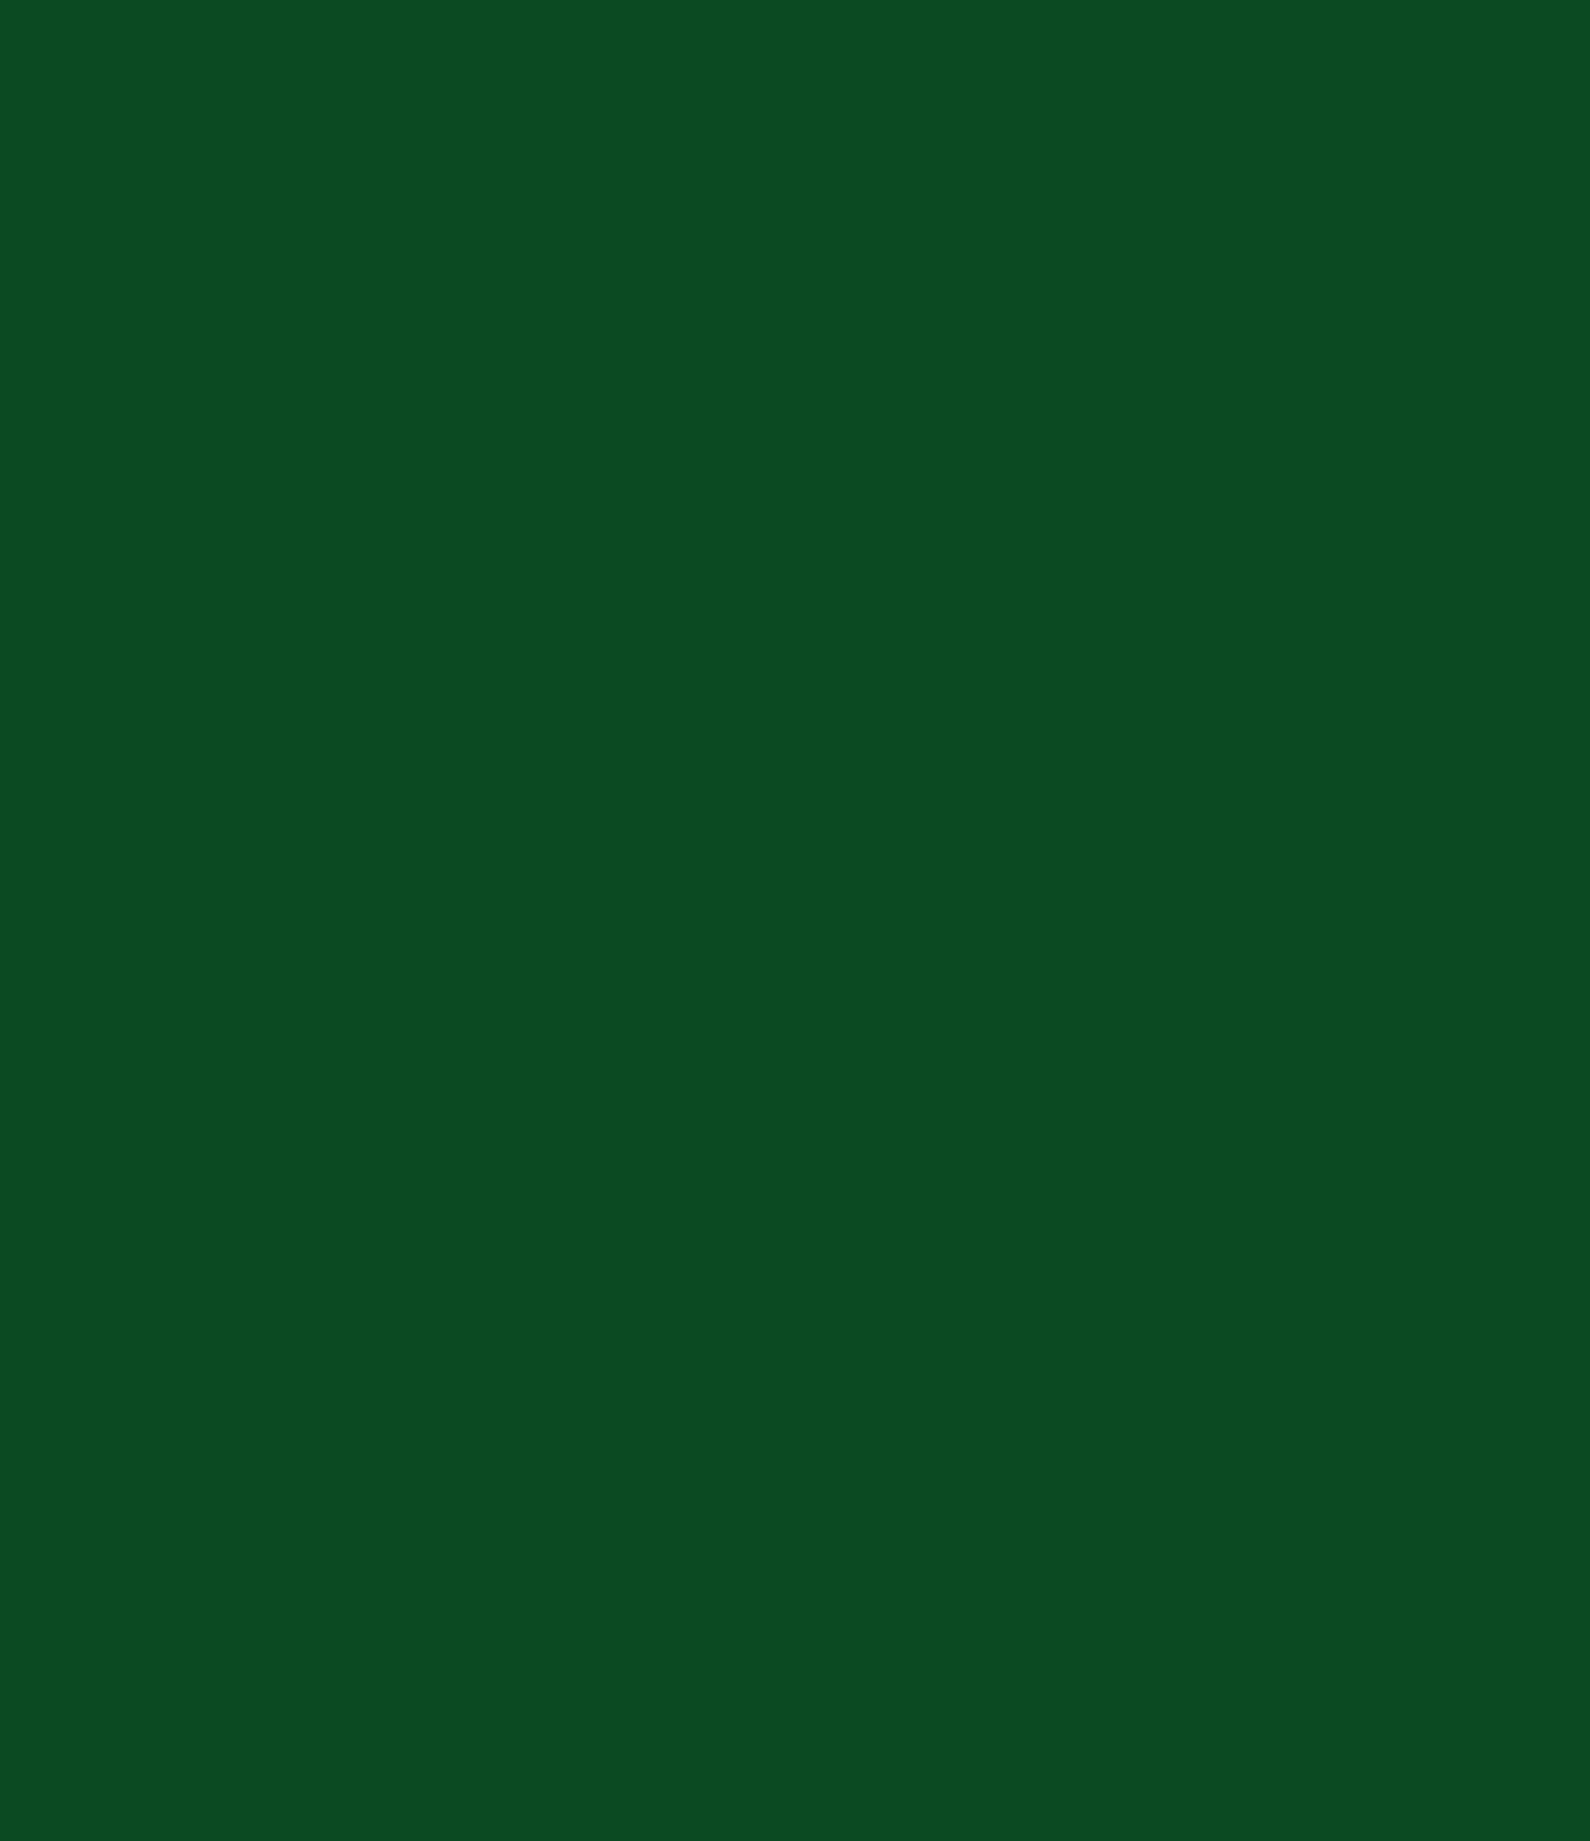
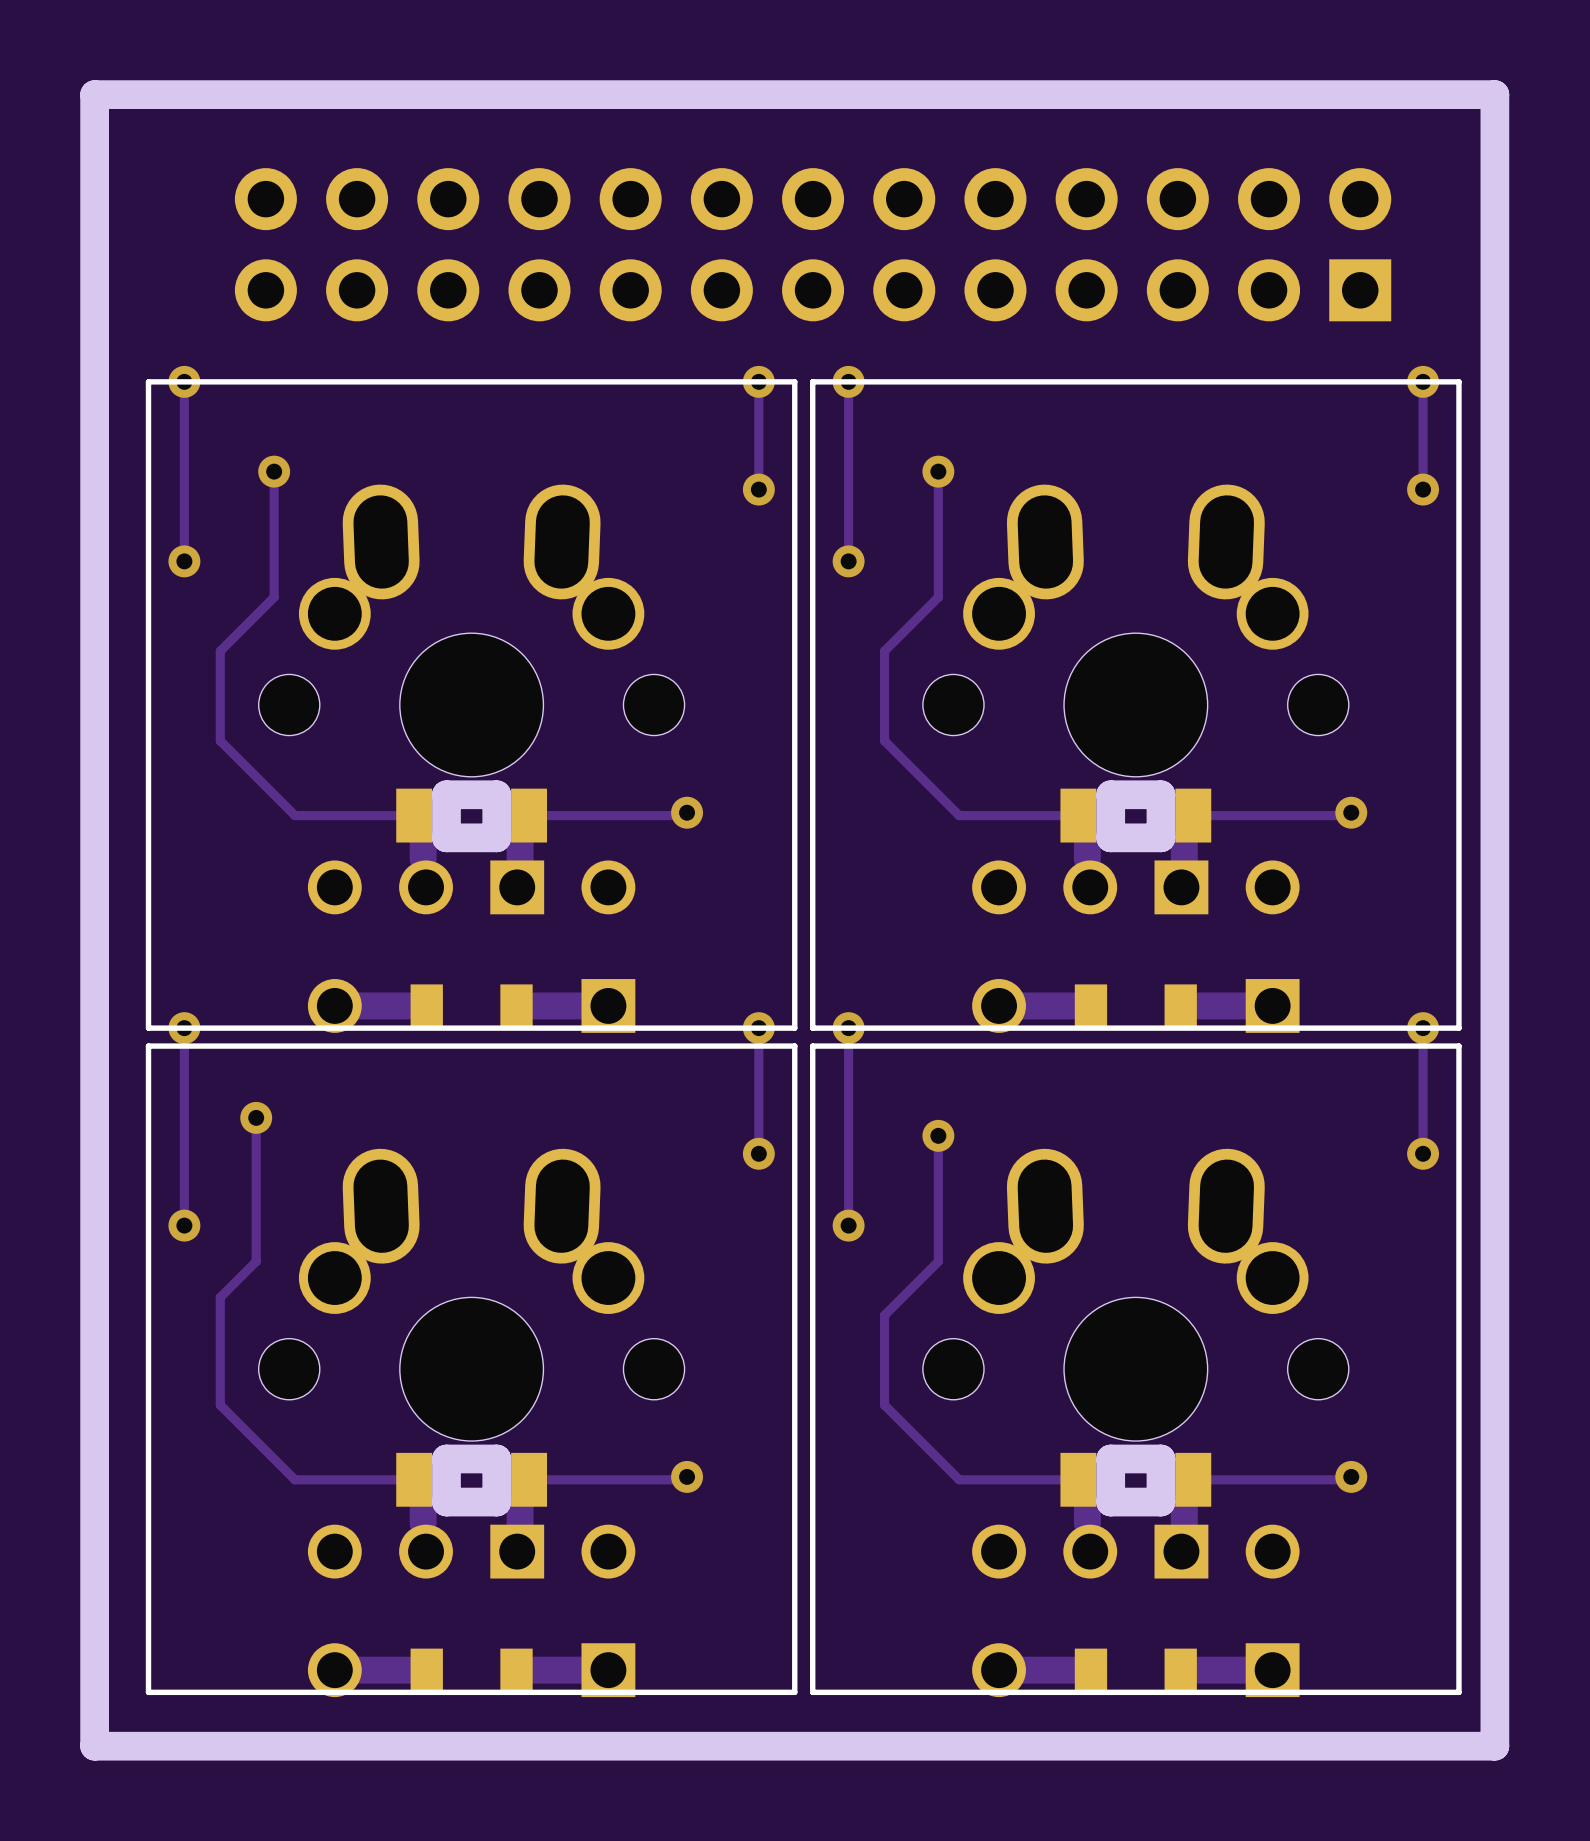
board edge: none -> (1494, 94) (1494, 1746) (94, 1746) (94, 94) (1494, 94)
part: none -> (813, 244)
track: none -> (184, 381) (184, 561)
via: none -> (184, 381)
track: none -> (758, 381) (758, 489)
via: none -> (758, 381)
track: none -> (848, 381) (848, 561)
via: none -> (848, 381)
track: none -> (1423, 381) (1423, 489)
via: none -> (1423, 381)
track: none -> (274, 471) (274, 597) (220, 651) (220, 740) (294, 815) (414, 815)
via: none -> (274, 471)
track: none -> (938, 471) (938, 597) (884, 651) (884, 740) (959, 815) (1078, 815)
via: none -> (938, 471)
via: none -> (758, 489)
via: none -> (1423, 489)
via: none -> (184, 561)
via: none -> (848, 561)
part: none -> (471, 706)
part: none -> (1135, 706)
track: none -> (687, 812) (684, 815) (529, 815)
via: none -> (687, 812)
track: none -> (1351, 812) (1348, 815) (1193, 815)
via: none -> (1351, 812)
track: none -> (184, 1028) (184, 1225)
via: none -> (184, 1028)
track: none -> (758, 1028) (758, 1153)
via: none -> (758, 1028)
track: none -> (848, 1028) (848, 1225)
via: none -> (848, 1028)
track: none -> (1423, 1028) (1423, 1153)
via: none -> (1423, 1028)
track: none -> (256, 1117) (256, 1261) (220, 1297) (220, 1405) (294, 1479) (414, 1479)
via: none -> (256, 1117)
track: none -> (938, 1135) (938, 1261) (884, 1315) (884, 1405) (959, 1479) (1078, 1479)
via: none -> (938, 1135)
via: none -> (758, 1153)
via: none -> (1423, 1153)
via: none -> (184, 1225)
via: none -> (848, 1225)
part: none -> (471, 1370)
part: none -> (1135, 1370)
track: none -> (687, 1476) (684, 1479) (529, 1479)
via: none -> (687, 1476)
track: none -> (1351, 1476) (1348, 1479) (1193, 1479)
via: none -> (1351, 1476)

